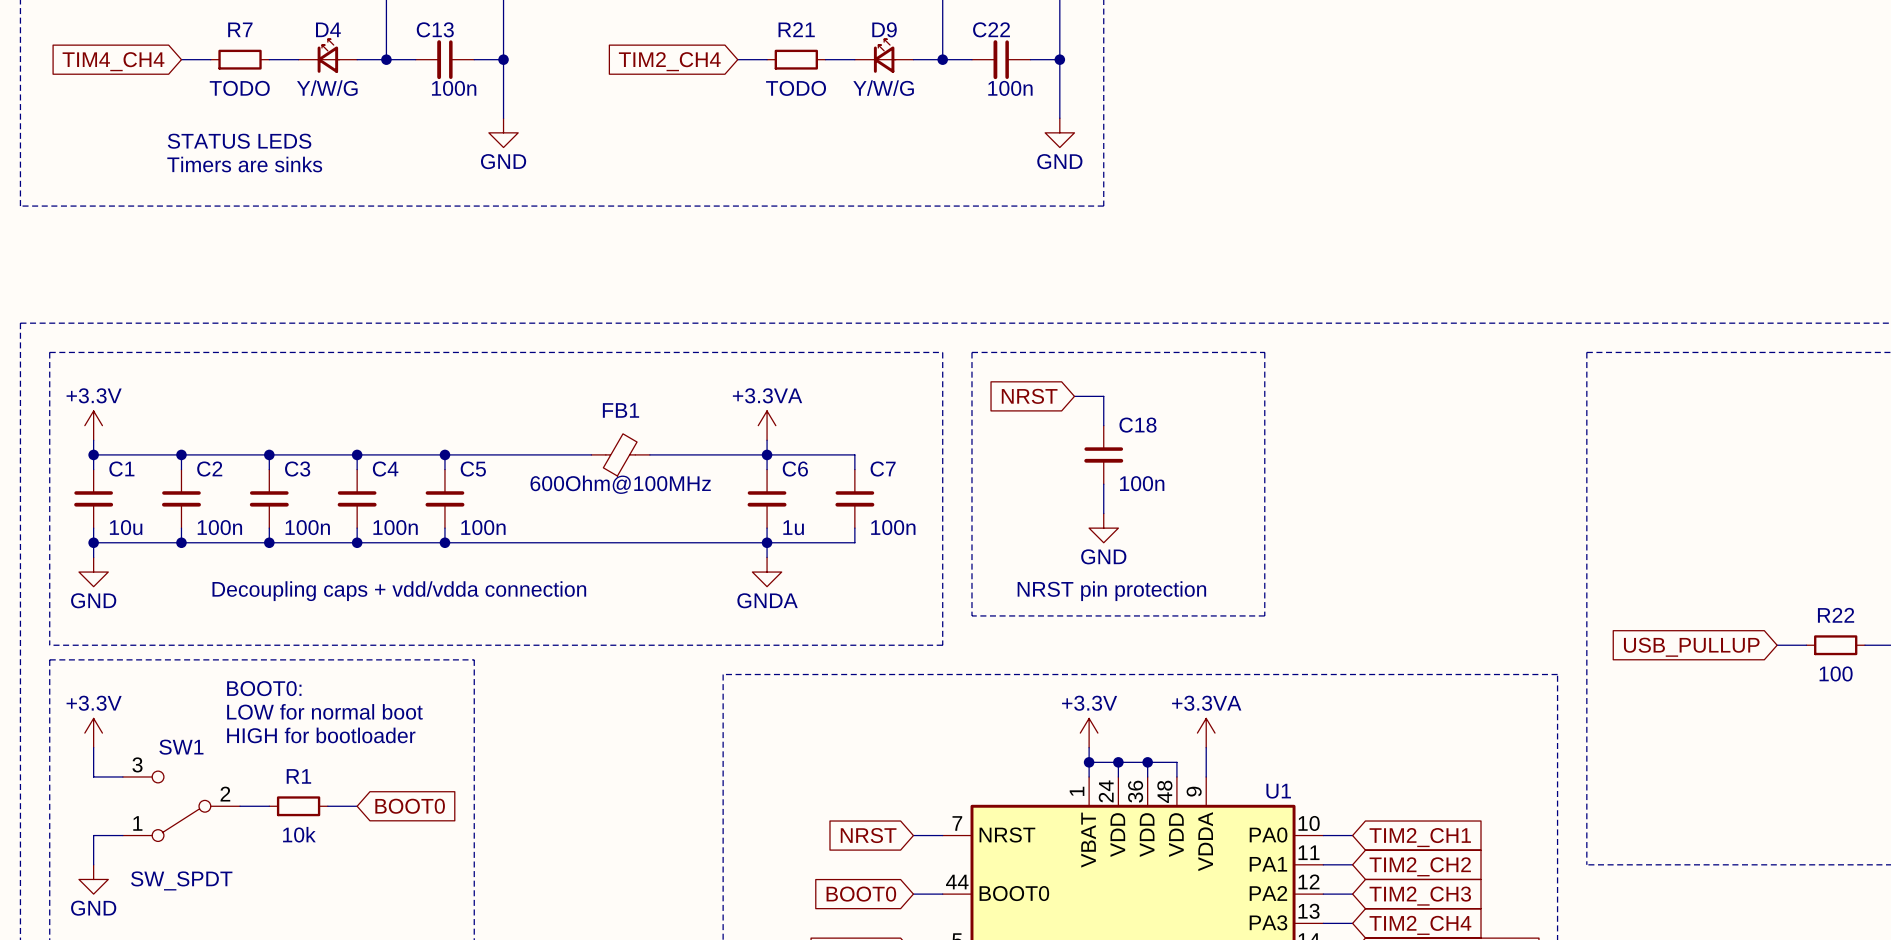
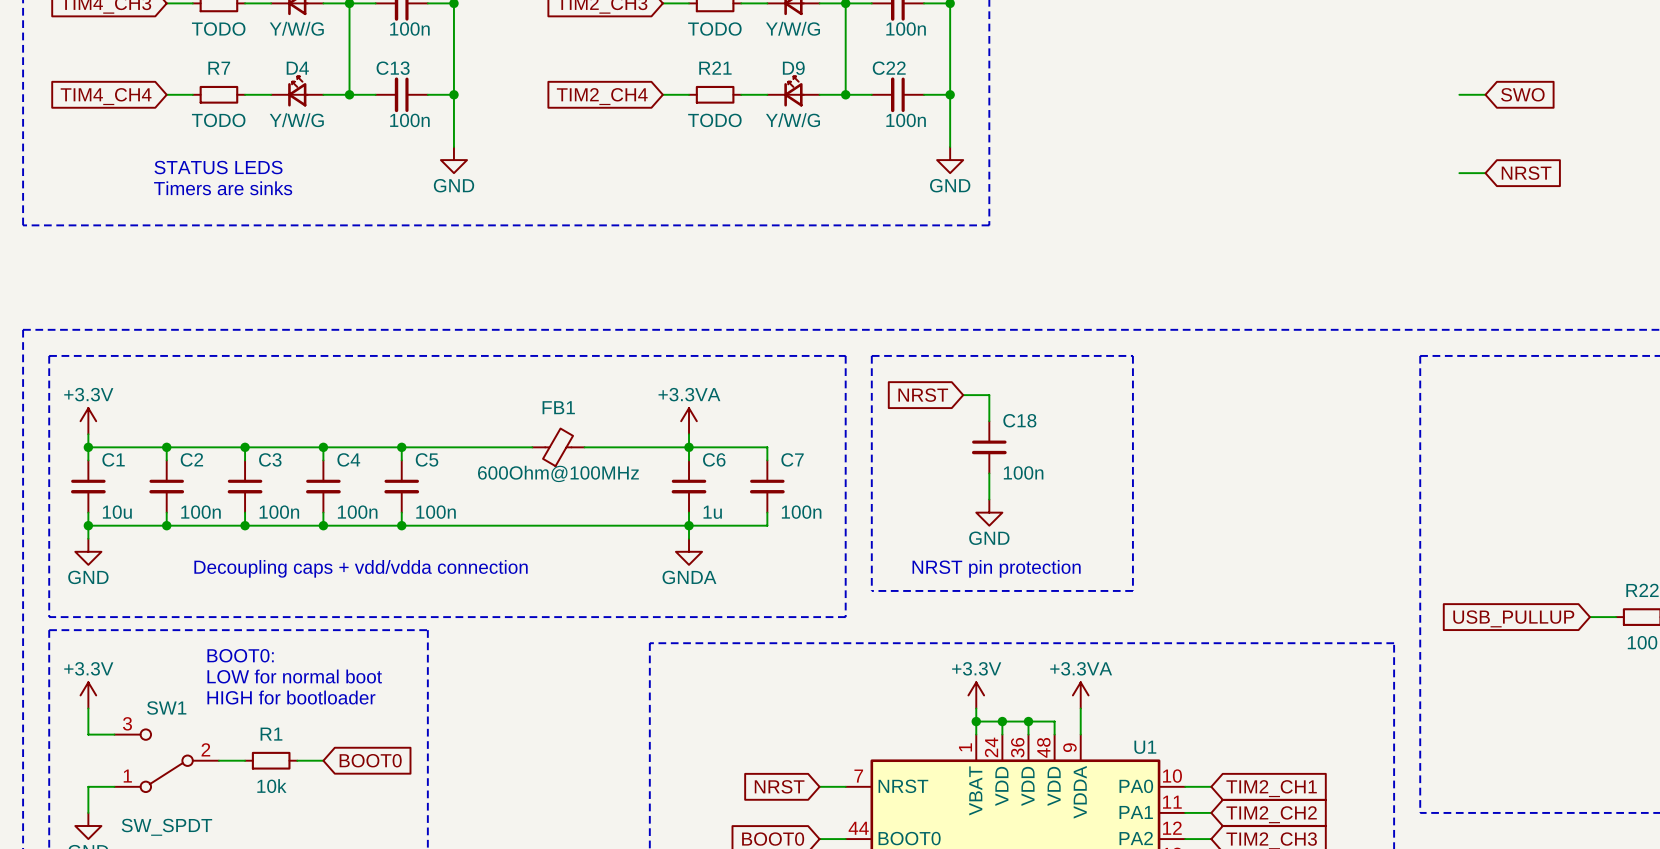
wire: none -> (1459, 94) (1485, 94)
global label: none -> SWO (1522, 94)
wire: none -> (1459, 173) (1485, 173)
global label: none -> NRST (1526, 173)

